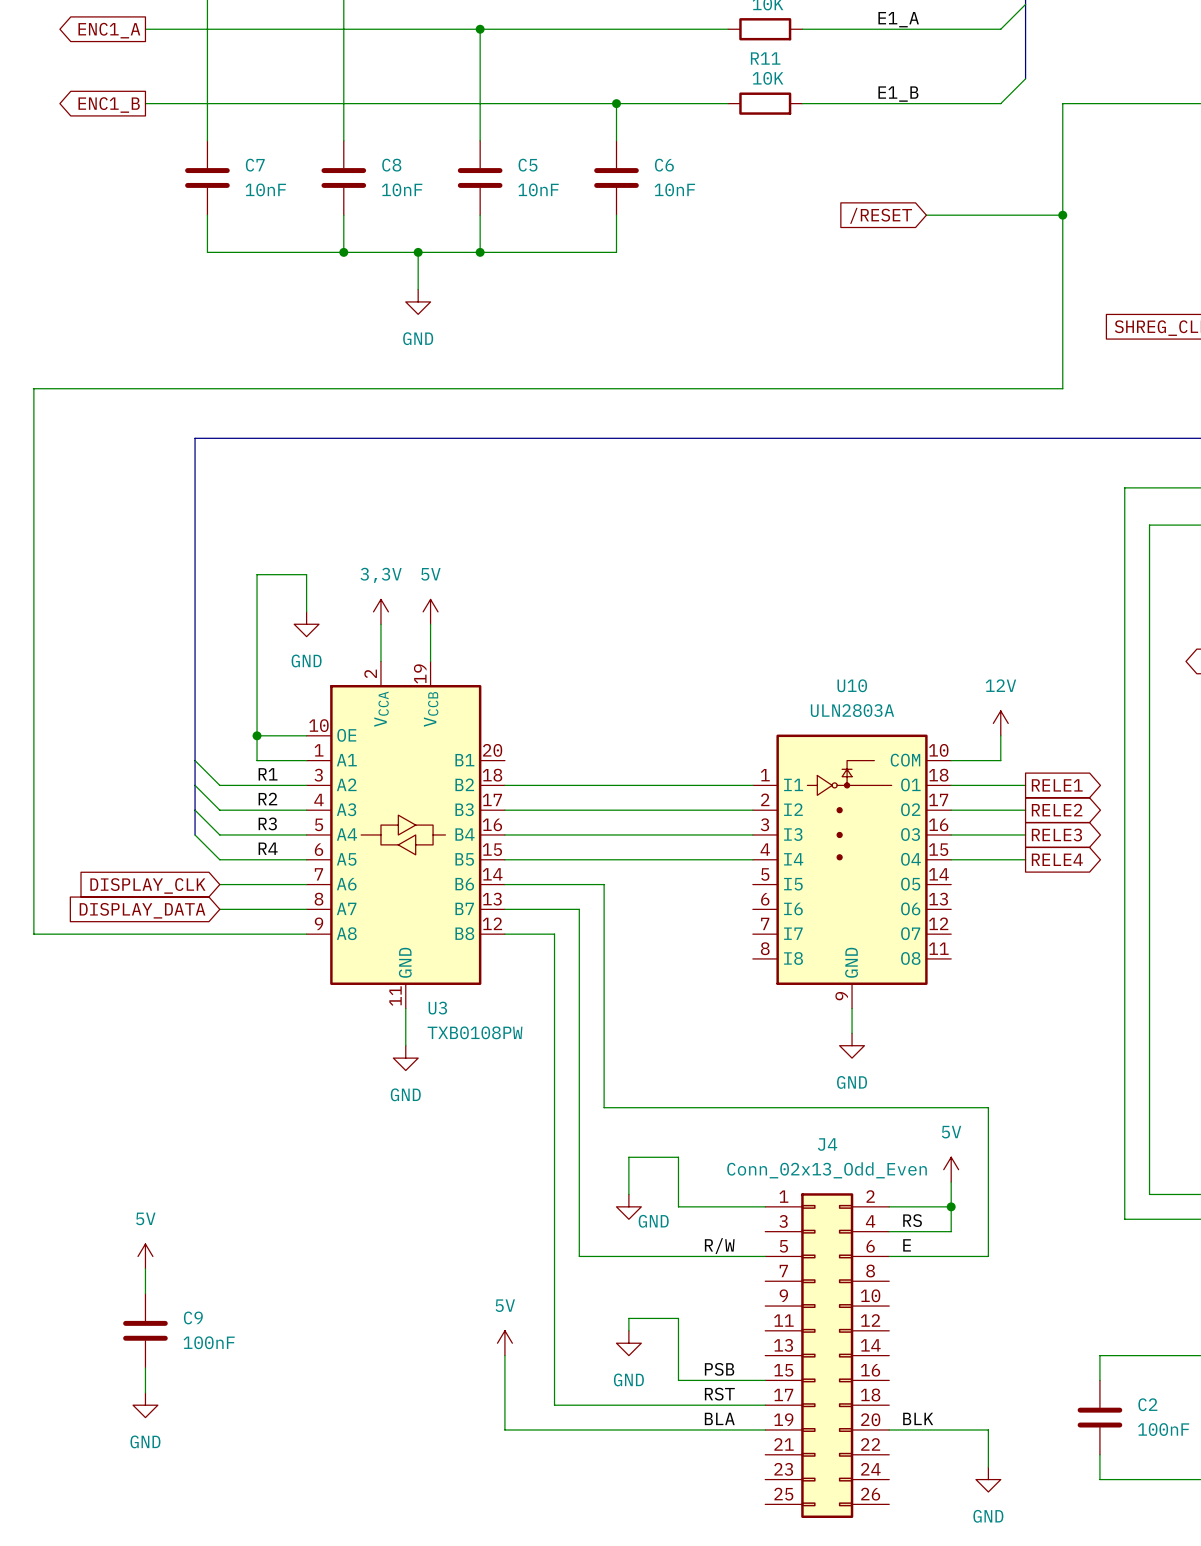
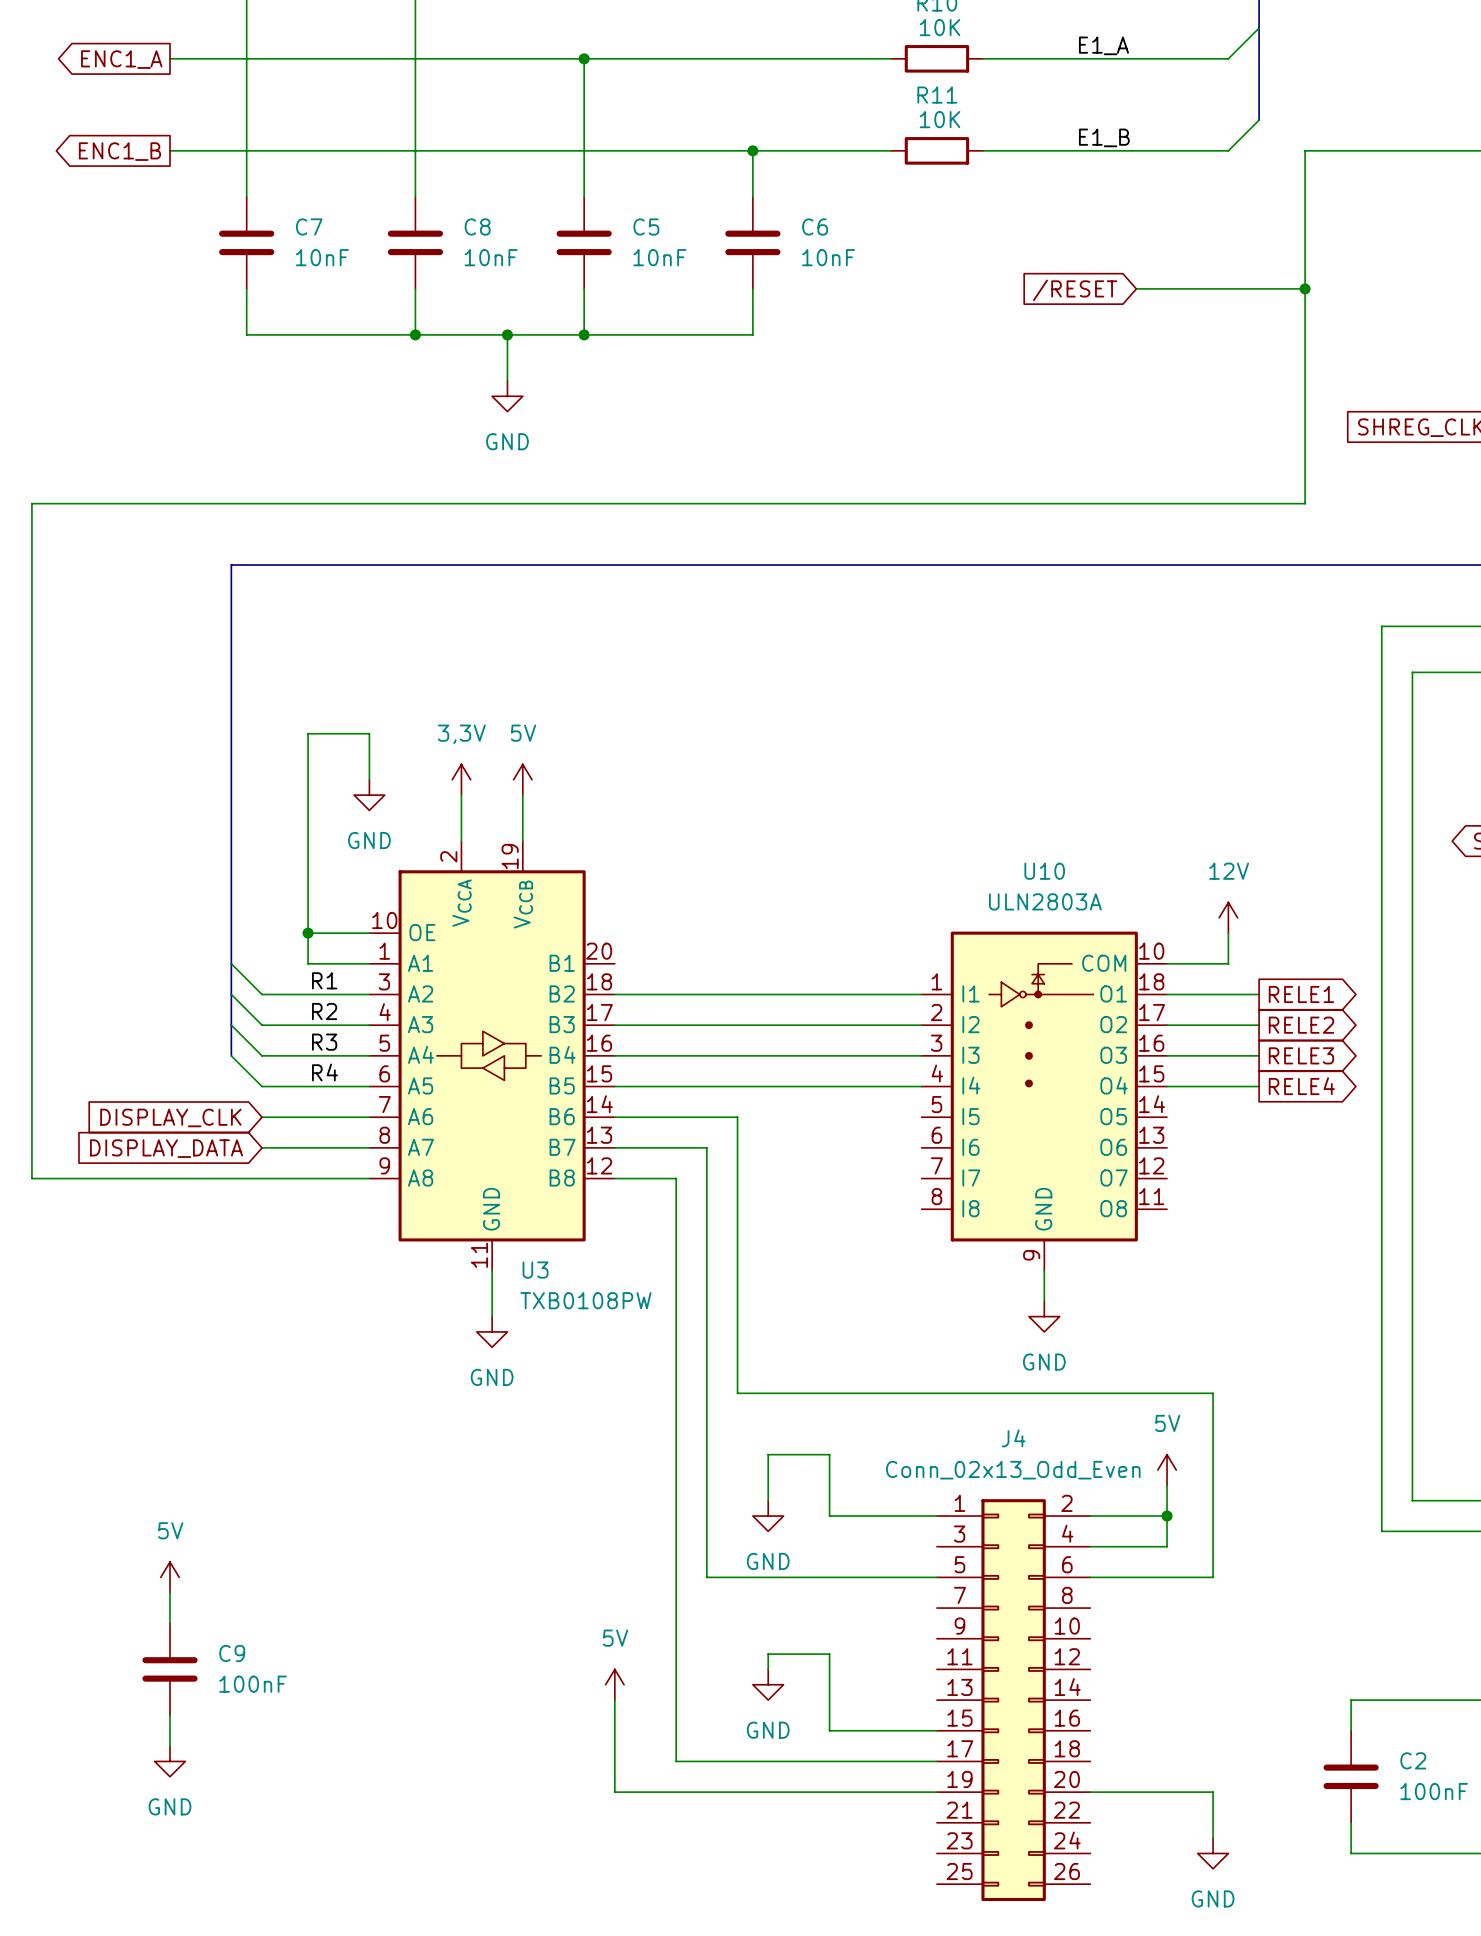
label: RS (912, 1220) -> none
power symbol text position: GND (653, 1221) -> GND (768, 1561)
label: E (907, 1245) -> none
label: R/W (719, 1246) -> none
label: PSB (719, 1369) -> none
label: RST (719, 1394) -> none
label: BLA (719, 1418) -> none
label: BLK (918, 1418) -> none

